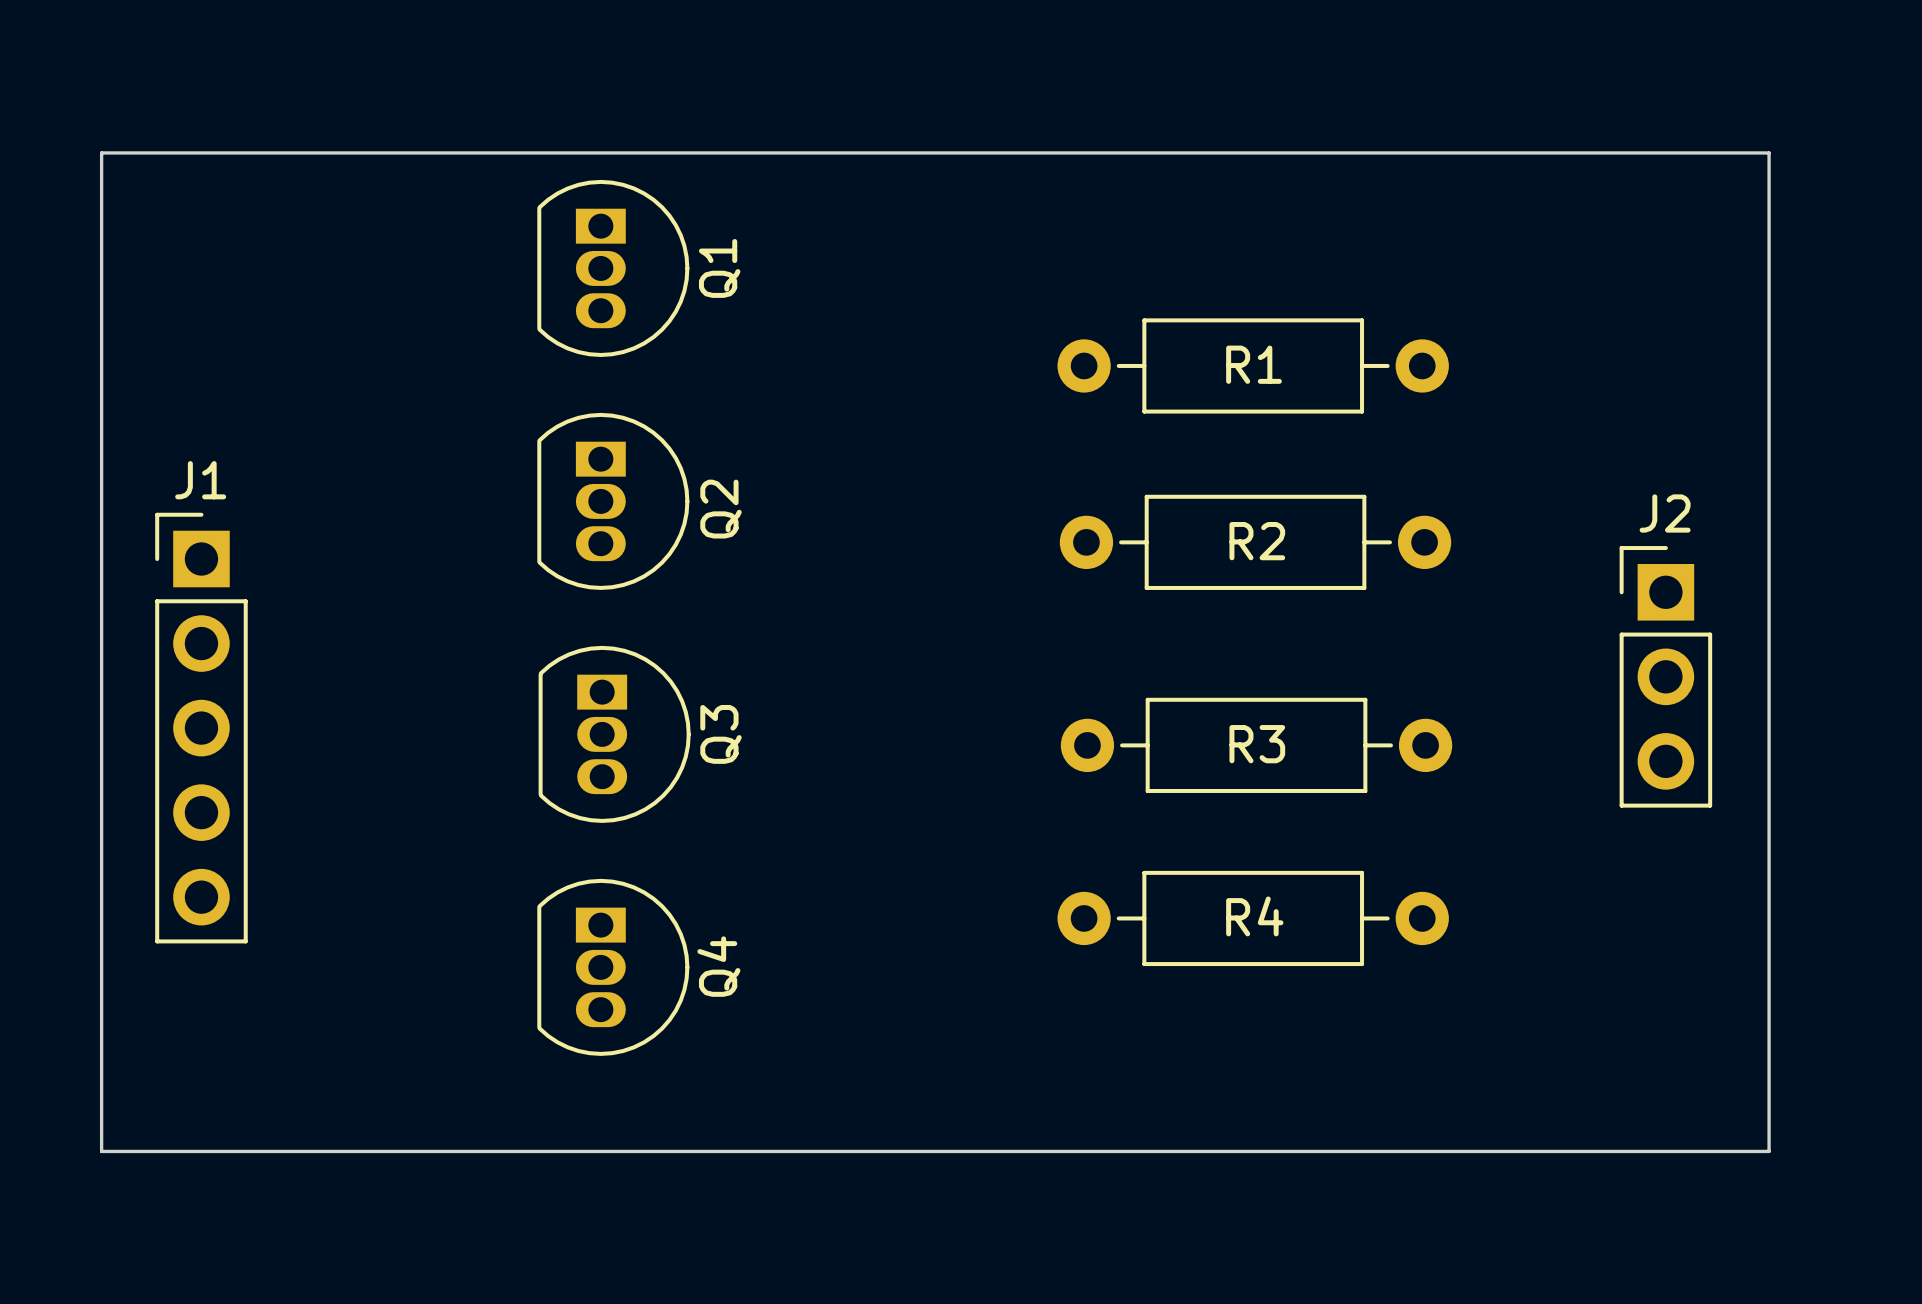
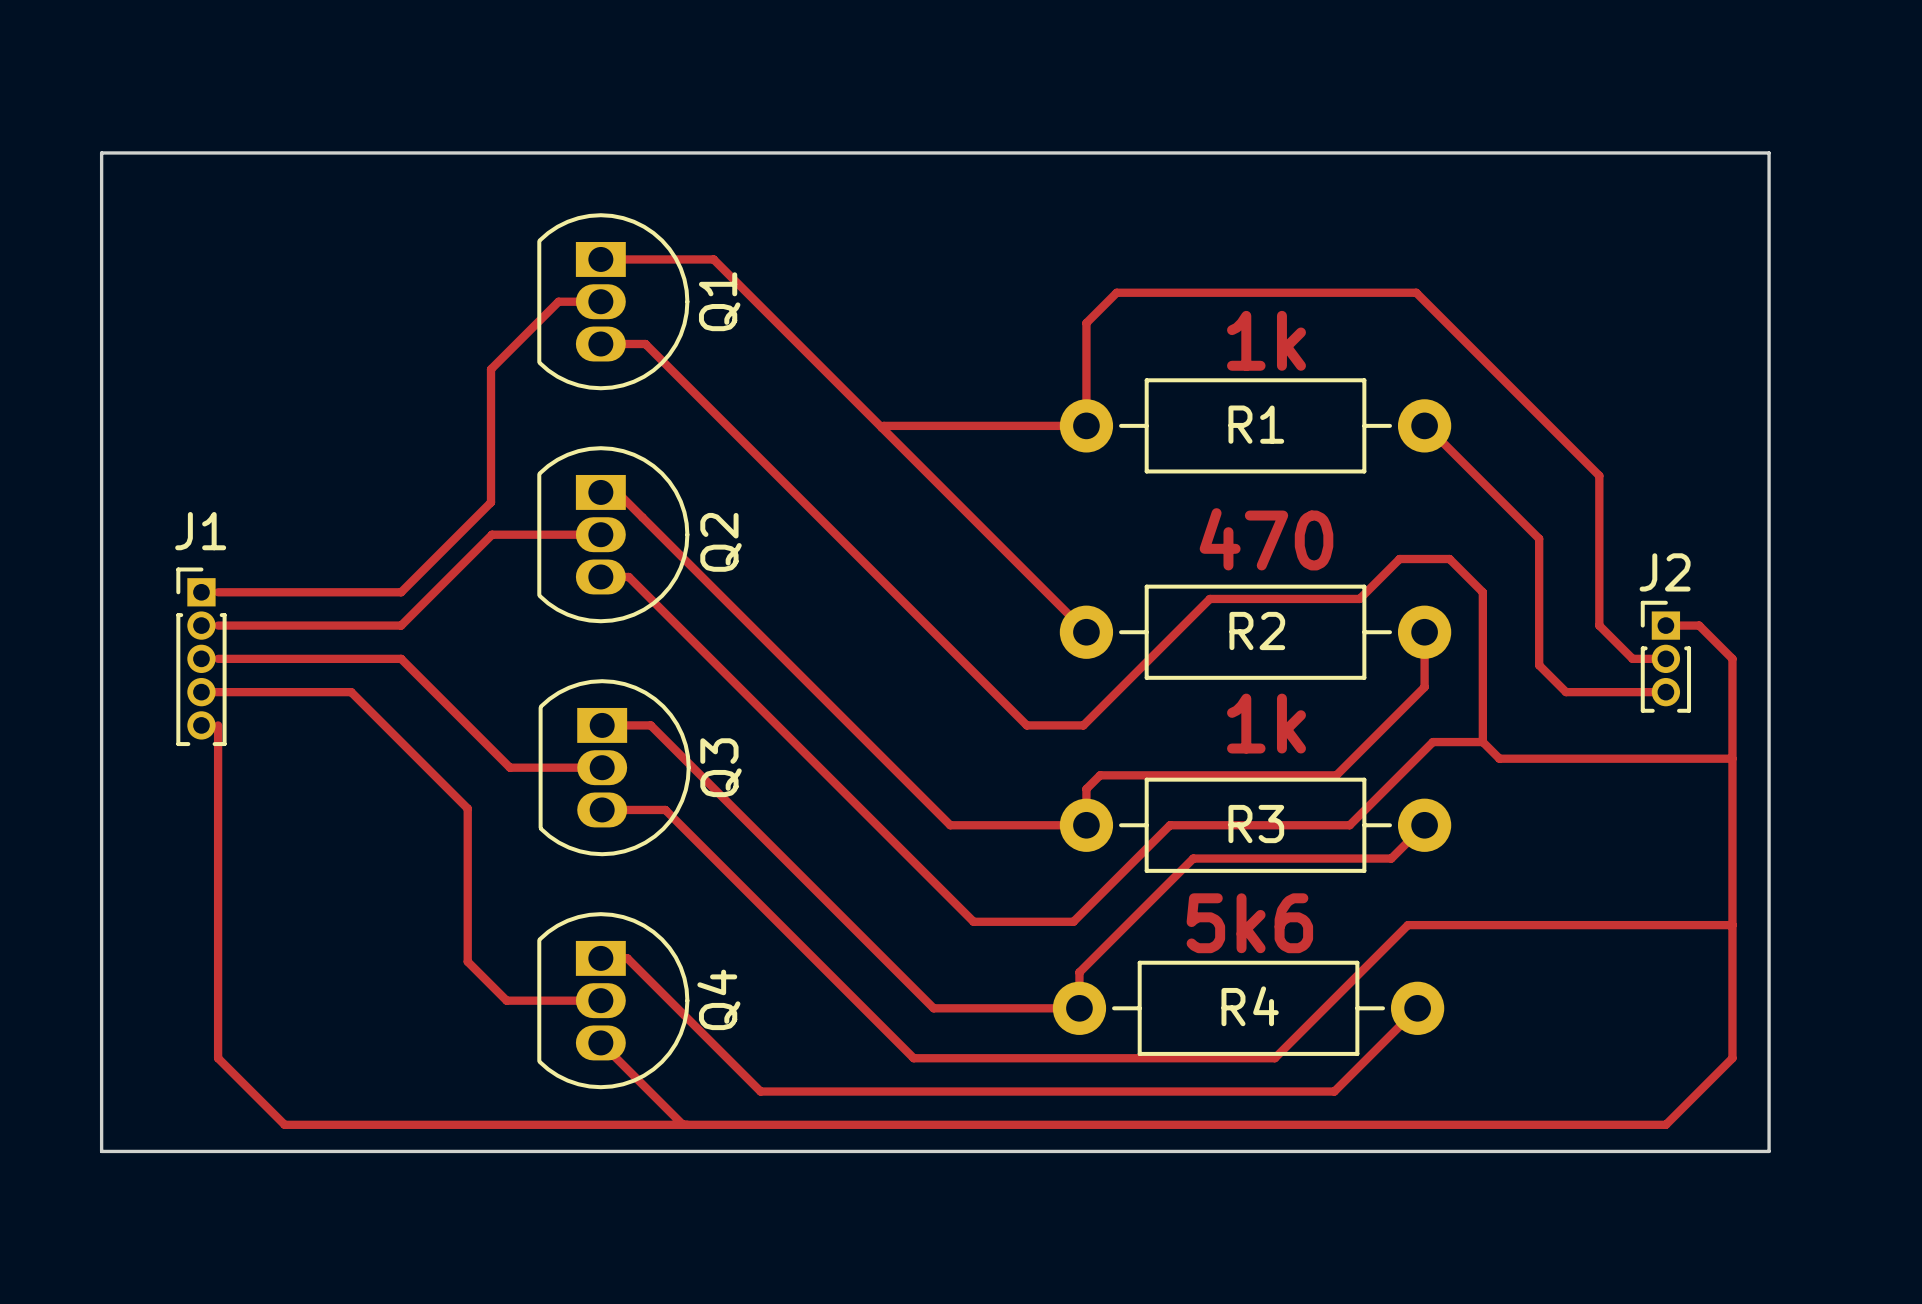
track: none -> (600, 259) (713, 259) (1086, 632)
Q1 position: (613, 268) -> (613, 301)
track: none -> (600, 301) (558, 301) (491, 369) (491, 502) (401, 592) (218, 592)
text: none -> 1k (1266, 340)
track: none -> (600, 344) (645, 344) (1026, 725) (1083, 725) (1209, 598) (1359, 598) (1399, 559) (1449, 559) (1482, 592) (1482, 742)
R1 position: (1253, 365) -> (1255, 425)
track: none -> (1424, 425) (1539, 538) (1539, 665) (1566, 692) (1665, 692)
track: none -> (881, 427) (883, 425) (1086, 425) (1086, 323) (1116, 292) (1416, 292) (1599, 475) (1599, 625) (1632, 658) (1665, 658)
J1 name position: J1 (200, 480) -> J1 (200, 531)
track: none -> (600, 492) (617, 492) (950, 825) (1086, 825) (1086, 788) (1100, 775) (1336, 775) (1424, 687) (1424, 632)
Q2 position: (613, 501) -> (613, 534)
J1 footprint: [155, 512, 248, 944] -> [176, 567, 227, 747]
J2 name position: J2 (1665, 513) -> J2 (1665, 572)
track: none -> (600, 534) (492, 534) (401, 625) (218, 625)
text: none -> 470 (1266, 539)
R2 position: (1255, 542) -> (1255, 632)
J2 footprint: [1619, 546, 1713, 808] -> [1640, 600, 1692, 713]
track: none -> (600, 576) (628, 576) (973, 921) (1073, 921) (1169, 825) (1349, 825) (1432, 742) (1482, 742)
track: none -> (1665, 625) (1699, 625) (1732, 658) (1732, 1058) (1665, 1124) (284, 1124) (218, 1058) (218, 725)
track: none -> (218, 658) (401, 658) (509, 767) (602, 767)
track: none -> (201, 692) (351, 692) (467, 808) (467, 961) (506, 1000) (600, 1000)
text: none -> 1k (1266, 723)
track: none -> (602, 725) (650, 725) (933, 1008) (1079, 1008) (1079, 972) (1193, 858) (1391, 858) (1424, 825)
Q3 position: (614, 734) -> (614, 767)
track: none -> (1482, 742) (1499, 758) (1732, 758)
R3 position: (1256, 745) -> (1255, 825)
track: none -> (602, 809) (665, 809) (913, 1058) (1274, 1058) (1407, 925) (1732, 925)
R4 position: (1253, 918) -> (1248, 1008)
text: none -> 5k6 (1249, 923)
track: none -> (600, 958) (627, 958) (760, 1091) (1334, 1091) (1417, 1008)
Q4 position: (613, 967) -> (613, 1000)
track: none -> (601, 1042) (682, 1124)

